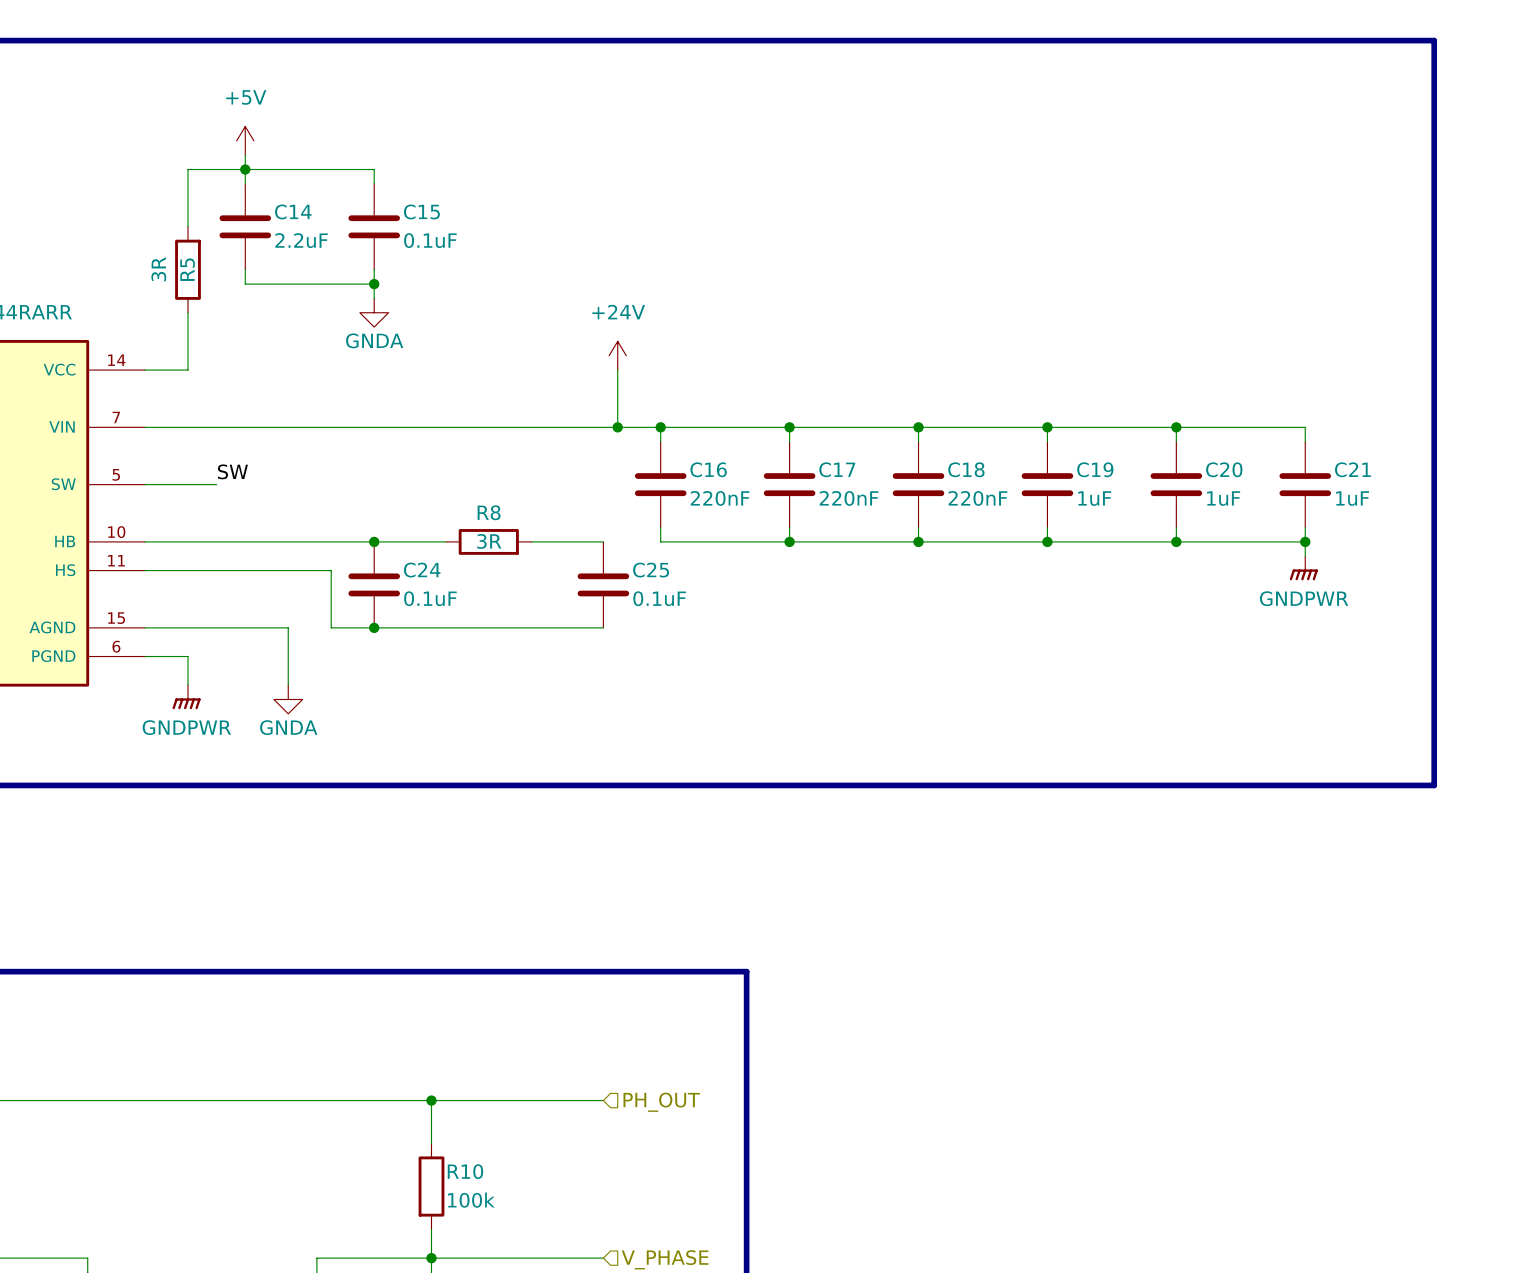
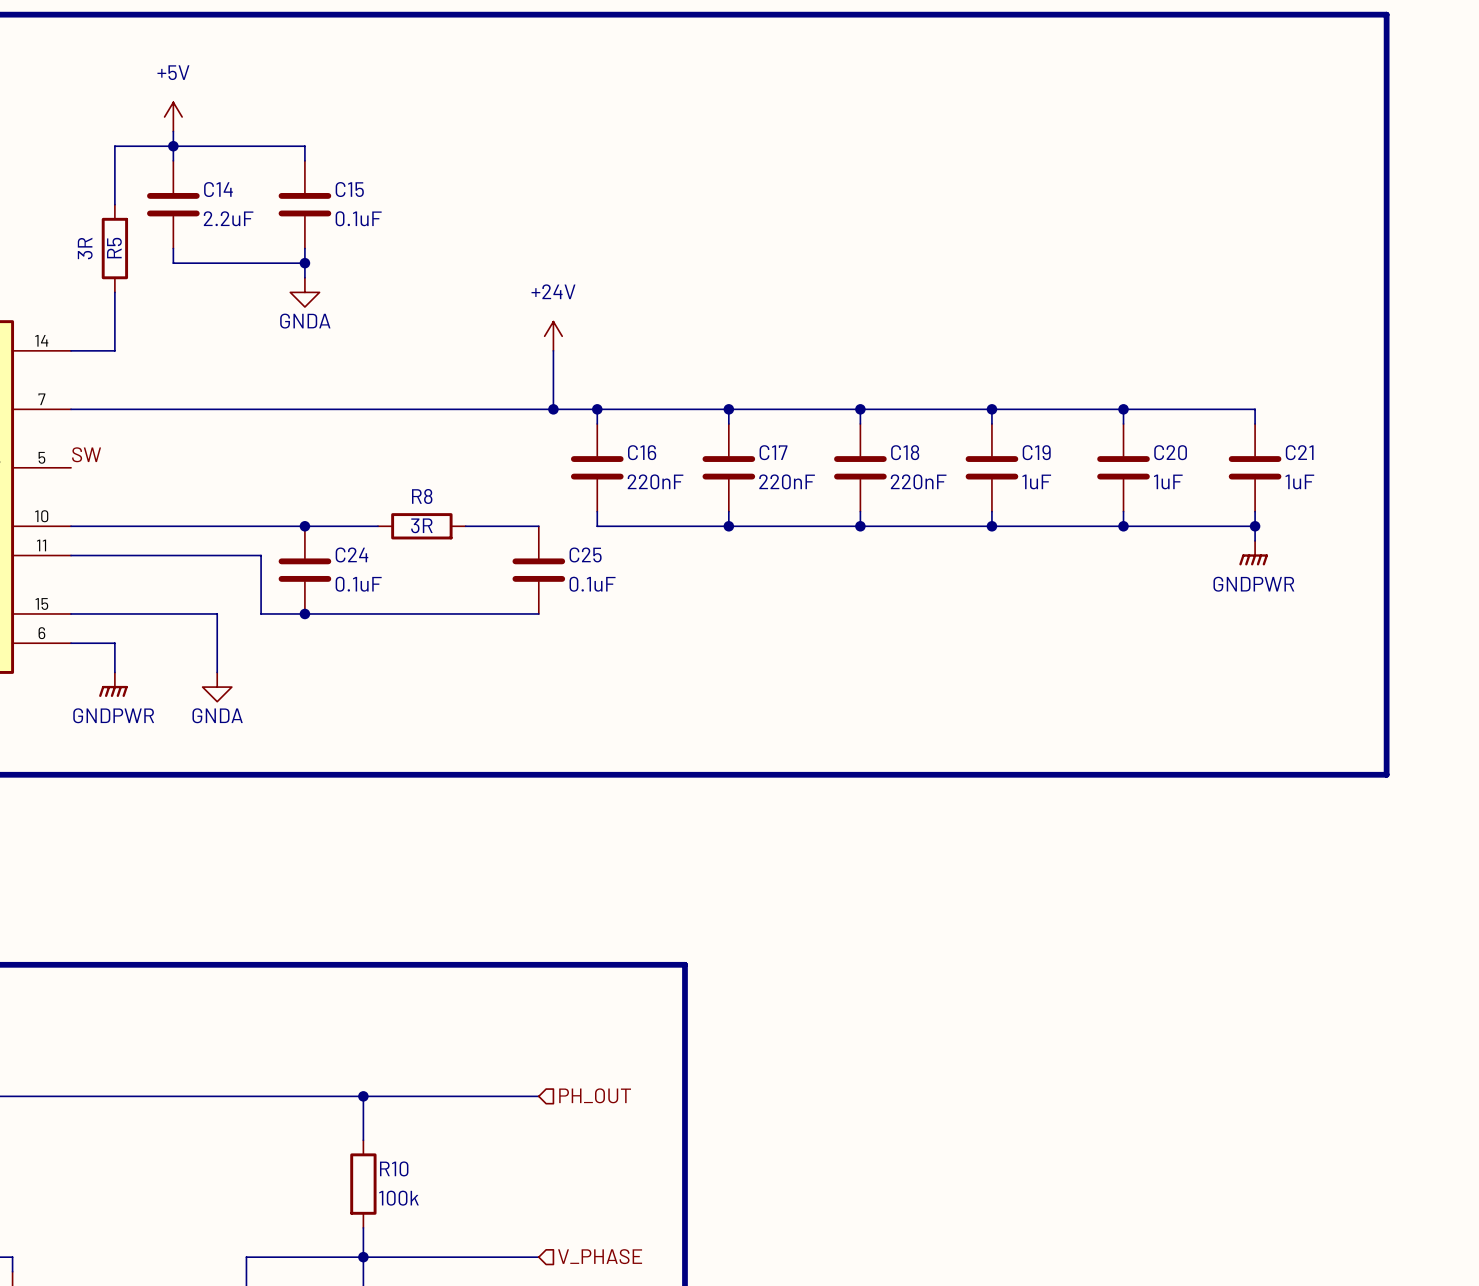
label position: SW (232, 471) -> SW (86, 454)
wire: (145, 484) (216, 484) -> none

